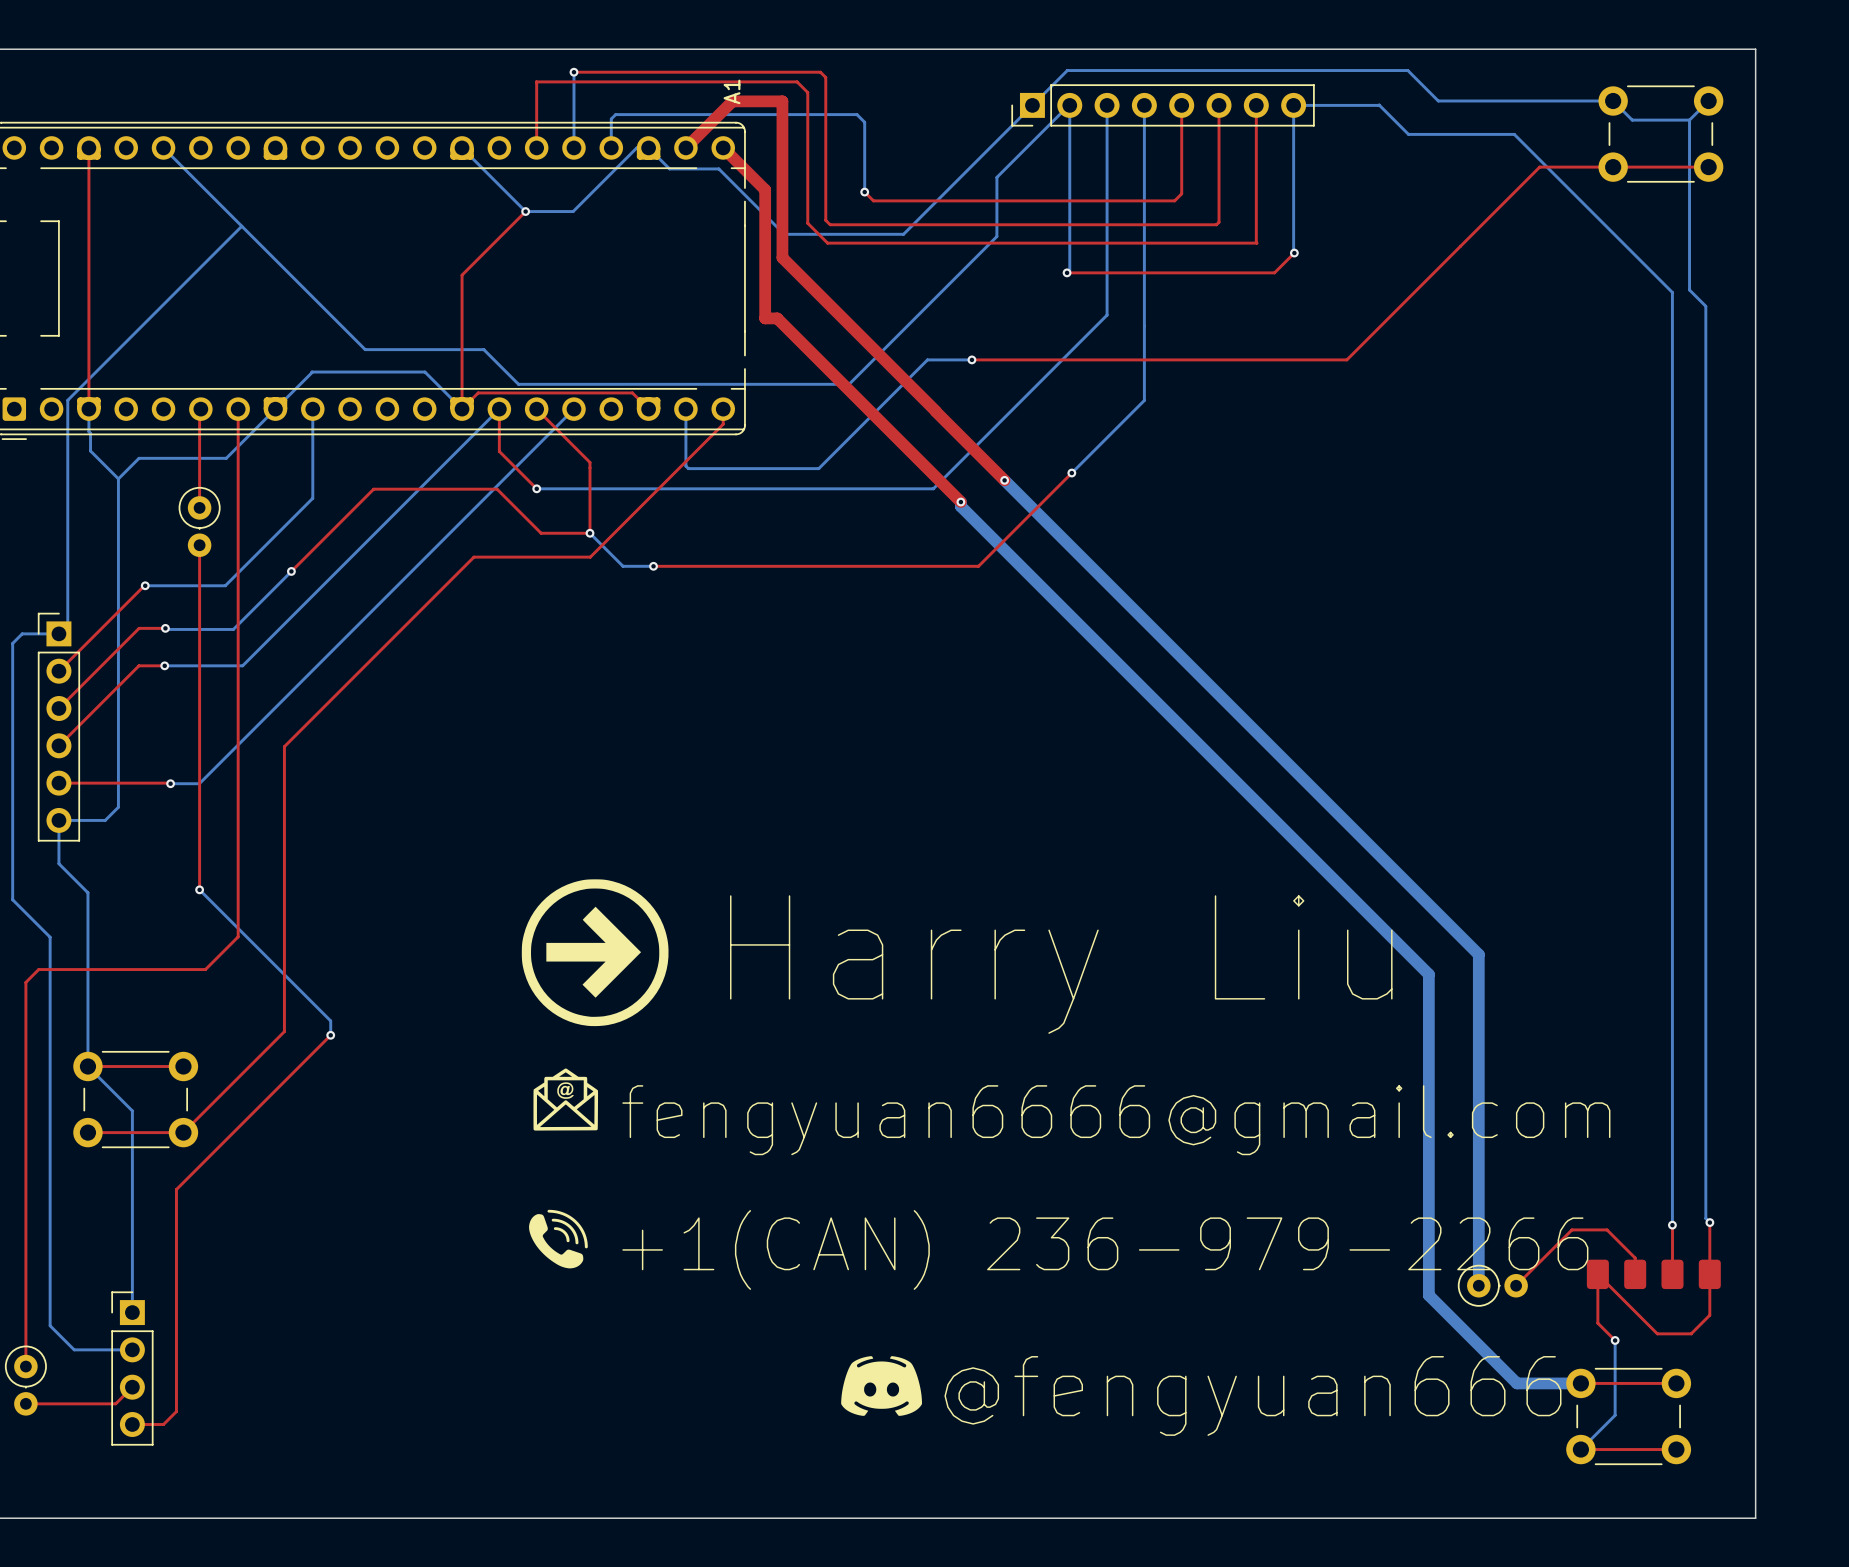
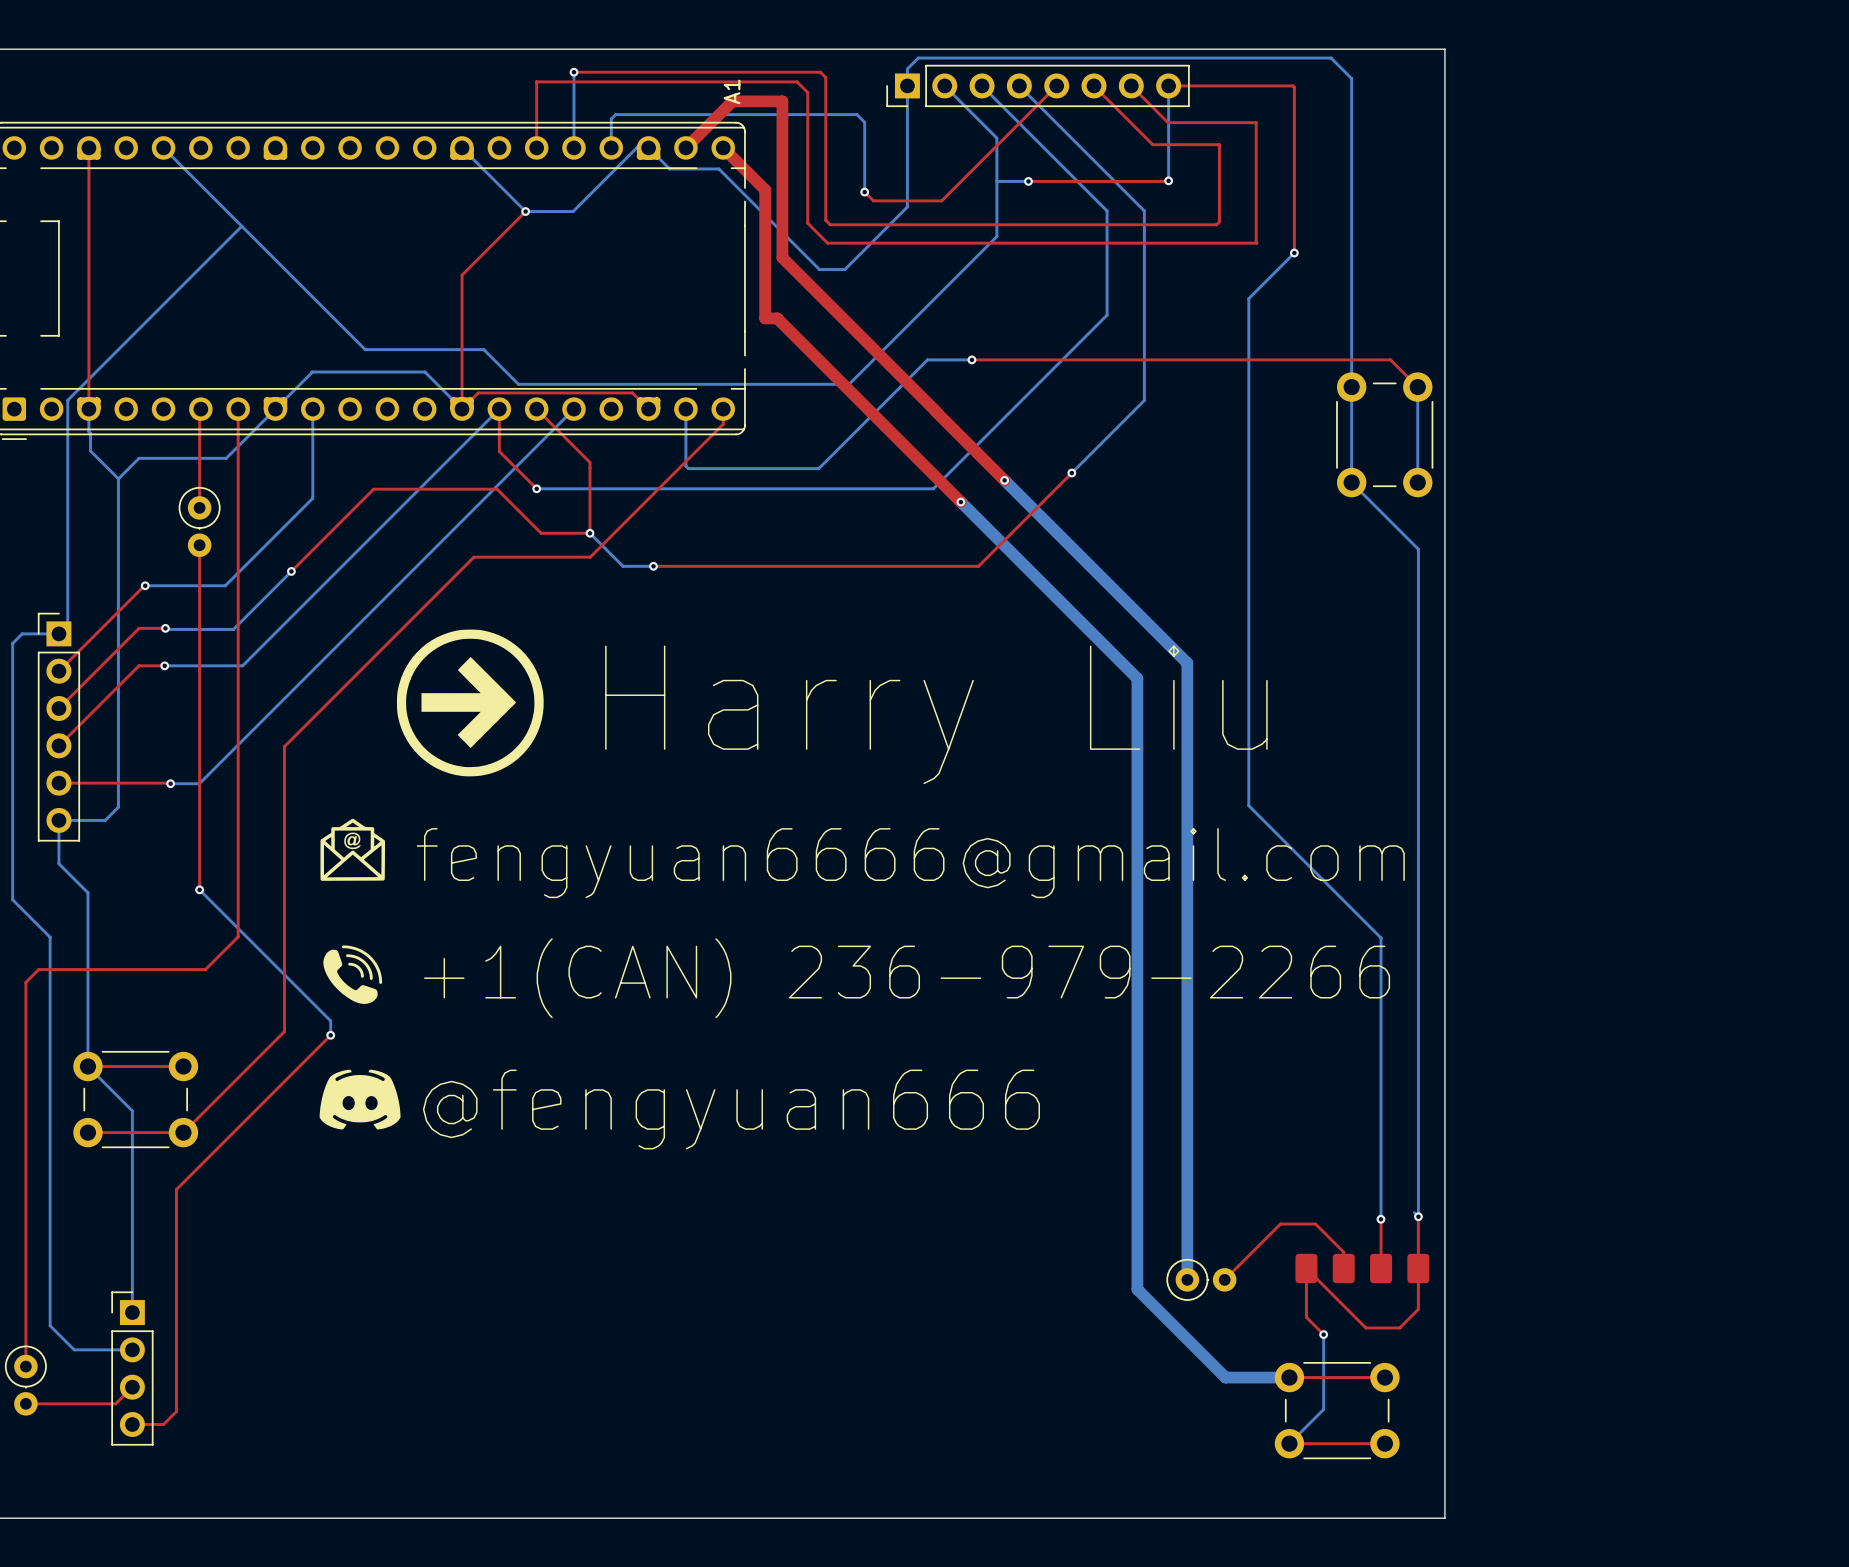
board edge: (1444, 49) (1755, 49) (1755, 1518) (1444, 1518) -> (1444, 49) (1444, 1518)
bottom track: none -> (1168, 85) (1168, 180)
bottom track: (1708, 101) (1689, 120) -> none
bottom track: (1107, 105) (1107, 210) -> (982, 85) (1107, 210)
bottom track: (1144, 105) (1144, 210) -> (1019, 85) (1144, 210)
part position: (1163, 105) -> (1038, 85)
top track: (1181, 105) (1181, 193) (1174, 200) (941, 200) -> (1056, 85) (941, 200)
top track: (1219, 105) (1219, 222) -> (1094, 85) (1152, 144) (1219, 144) (1219, 222)
top track: (1256, 105) (1256, 242) -> (1131, 85) (1168, 122) (1256, 122) (1256, 242)
bottom track: (1689, 120) (1632, 120) (1613, 101) (1438, 101) (1407, 70) (1067, 70) (903, 234) (784, 234) -> (1414, 1212) (1418, 1216) (1418, 549) (1351, 482) (1351, 78) (1331, 58) (918, 58) (907, 68) (907, 206) (844, 269) (819, 269) (784, 234)
bottom track: (1689, 120) (1689, 289) (1705, 306) (1705, 1218) (1709, 1222) -> none
part: (1660, 134) -> none
top track: (1708, 167) (1539, 167) (1346, 359) -> (1417, 387) (1390, 359) (1346, 359)
bottom track: (996, 177) (1069, 105) (1069, 270) (1067, 272) -> (996, 177) (996, 138) (944, 85)
top track: none -> (1168, 180) (1028, 181)
via: none -> (1168, 180)
bottom track: none -> (996, 181) (1028, 181)
via: none -> (1028, 181)
bottom track: (1293, 252) (1293, 105) (1379, 105) (1408, 134) (1514, 134) (1672, 292) (1672, 1225) -> none
top track: (1294, 253) (1274, 272) (1067, 272) -> (1294, 253) (1294, 87) (1168, 85)
bottom track: none -> (1294, 253) (1248, 298) (1248, 805) (1381, 937) (1381, 1219)
via: (1067, 272) -> none
bottom track: none -> (1417, 387) (1417, 482)
part: none -> (1384, 434)
bottom track: (960, 502) (960, 506) (1428, 974) (1428, 1295) (1517, 1383) (1580, 1383) -> (960, 502) (1137, 678) (1137, 1289) (1225, 1377) (1289, 1377)
bottom track: (1187, 663) (1478, 954) (1478, 1285) -> (1187, 663) (1187, 1279)
drawing position: (595, 952) -> (470, 702)
text position: Harry Liu (1061, 964) -> Harry Liu (936, 714)
drawing: none -> [319, 1069, 401, 1130]
drawing position: (565, 1099) -> (352, 849)
text: none -> @fengyuan666 (731, 1109)
text position: fengyuan6666@gmail.com (1116, 1120) -> fengyuan6666@gmail.com (910, 863)
via: none -> (1418, 1216)
via: none -> (1380, 1219)
top track: (1709, 1222) (1709, 1315) (1691, 1333) (1657, 1333) (1597, 1274) (1597, 1323) (1615, 1340) -> (1418, 1216) (1418, 1309) (1400, 1327) (1365, 1327) (1306, 1268) (1306, 1317) (1323, 1334)
via: (1709, 1222) -> none
top track: (1672, 1225) (1672, 1274) -> (1381, 1219) (1381, 1268)
via: (1672, 1225) -> none
drawing position: (558, 1239) -> (352, 974)
text position: +1(CAN) 236-979-2266 (1105, 1249) -> +1(CAN) 236-979-2266 (907, 978)
top track: (1635, 1274) (1635, 1258) (1607, 1229) (1571, 1229) (1516, 1285) -> (1343, 1268) (1343, 1252) (1315, 1224) (1280, 1224) (1224, 1279)
part position: (1653, 1274) -> (1362, 1268)
part position: (1492, 1285) -> (1201, 1279)
via: none -> (1323, 1334)
bottom track: (1615, 1340) (1615, 1415) (1580, 1449) -> (1323, 1334) (1323, 1409) (1289, 1443)
via: (1615, 1340) -> none
drawing: [841, 1356, 923, 1416] -> none
top track: (1580, 1383) (1676, 1383) -> (1289, 1377) (1384, 1377)
text: @fengyuan666 (1252, 1395) -> none
part position: (1628, 1416) -> (1337, 1410)
top track: (1580, 1449) (1676, 1449) -> (1289, 1443) (1384, 1443)

